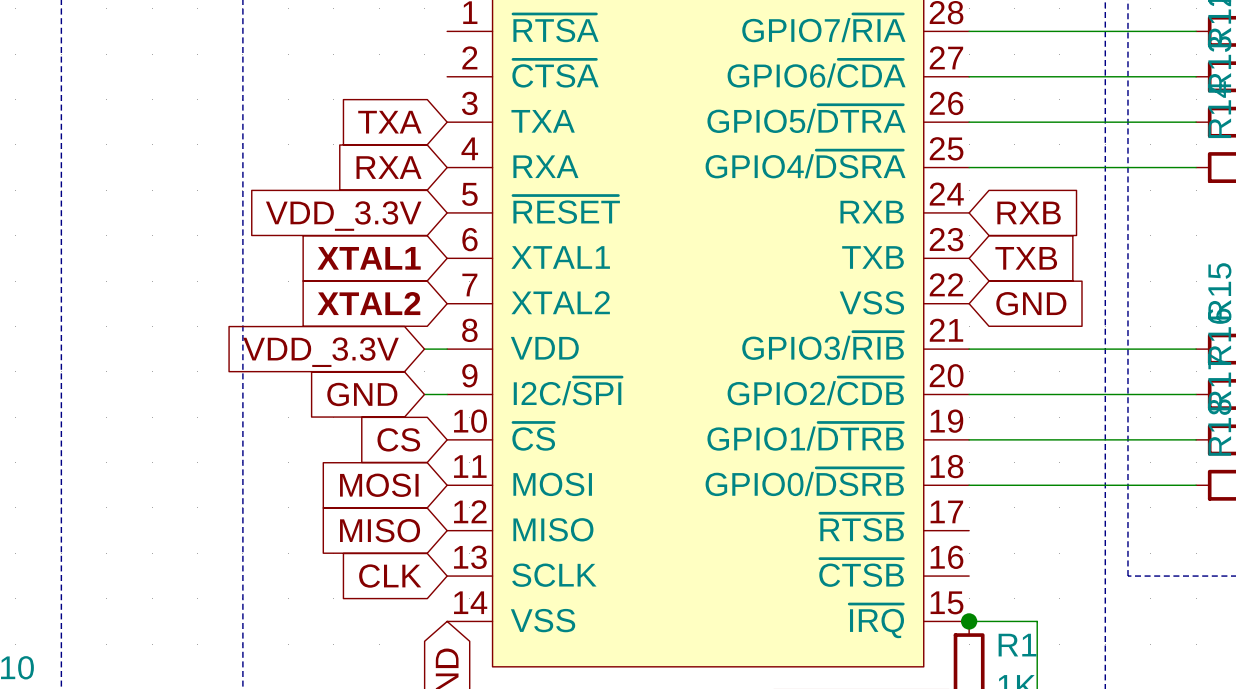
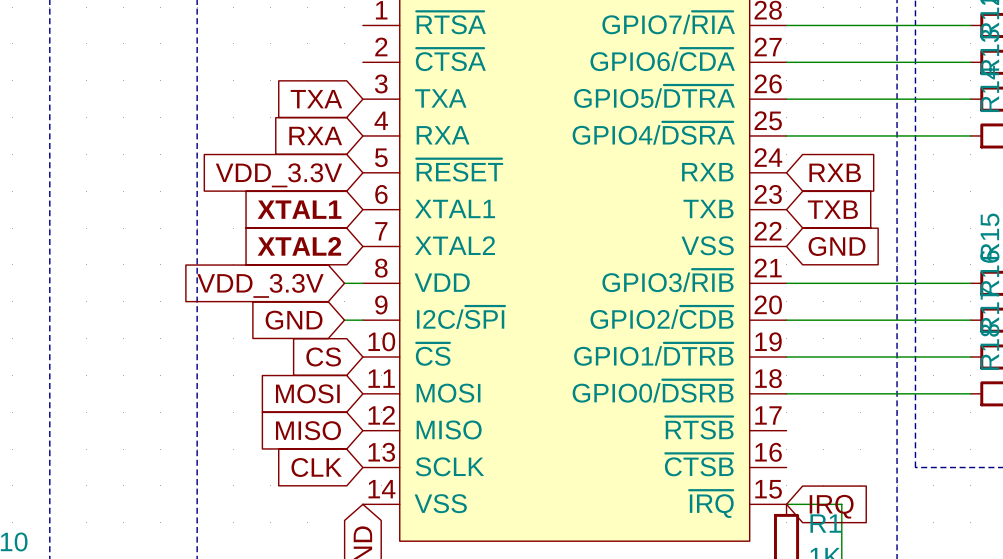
junction: (969, 621) -> none
global label: none -> IRQ (831, 506)

